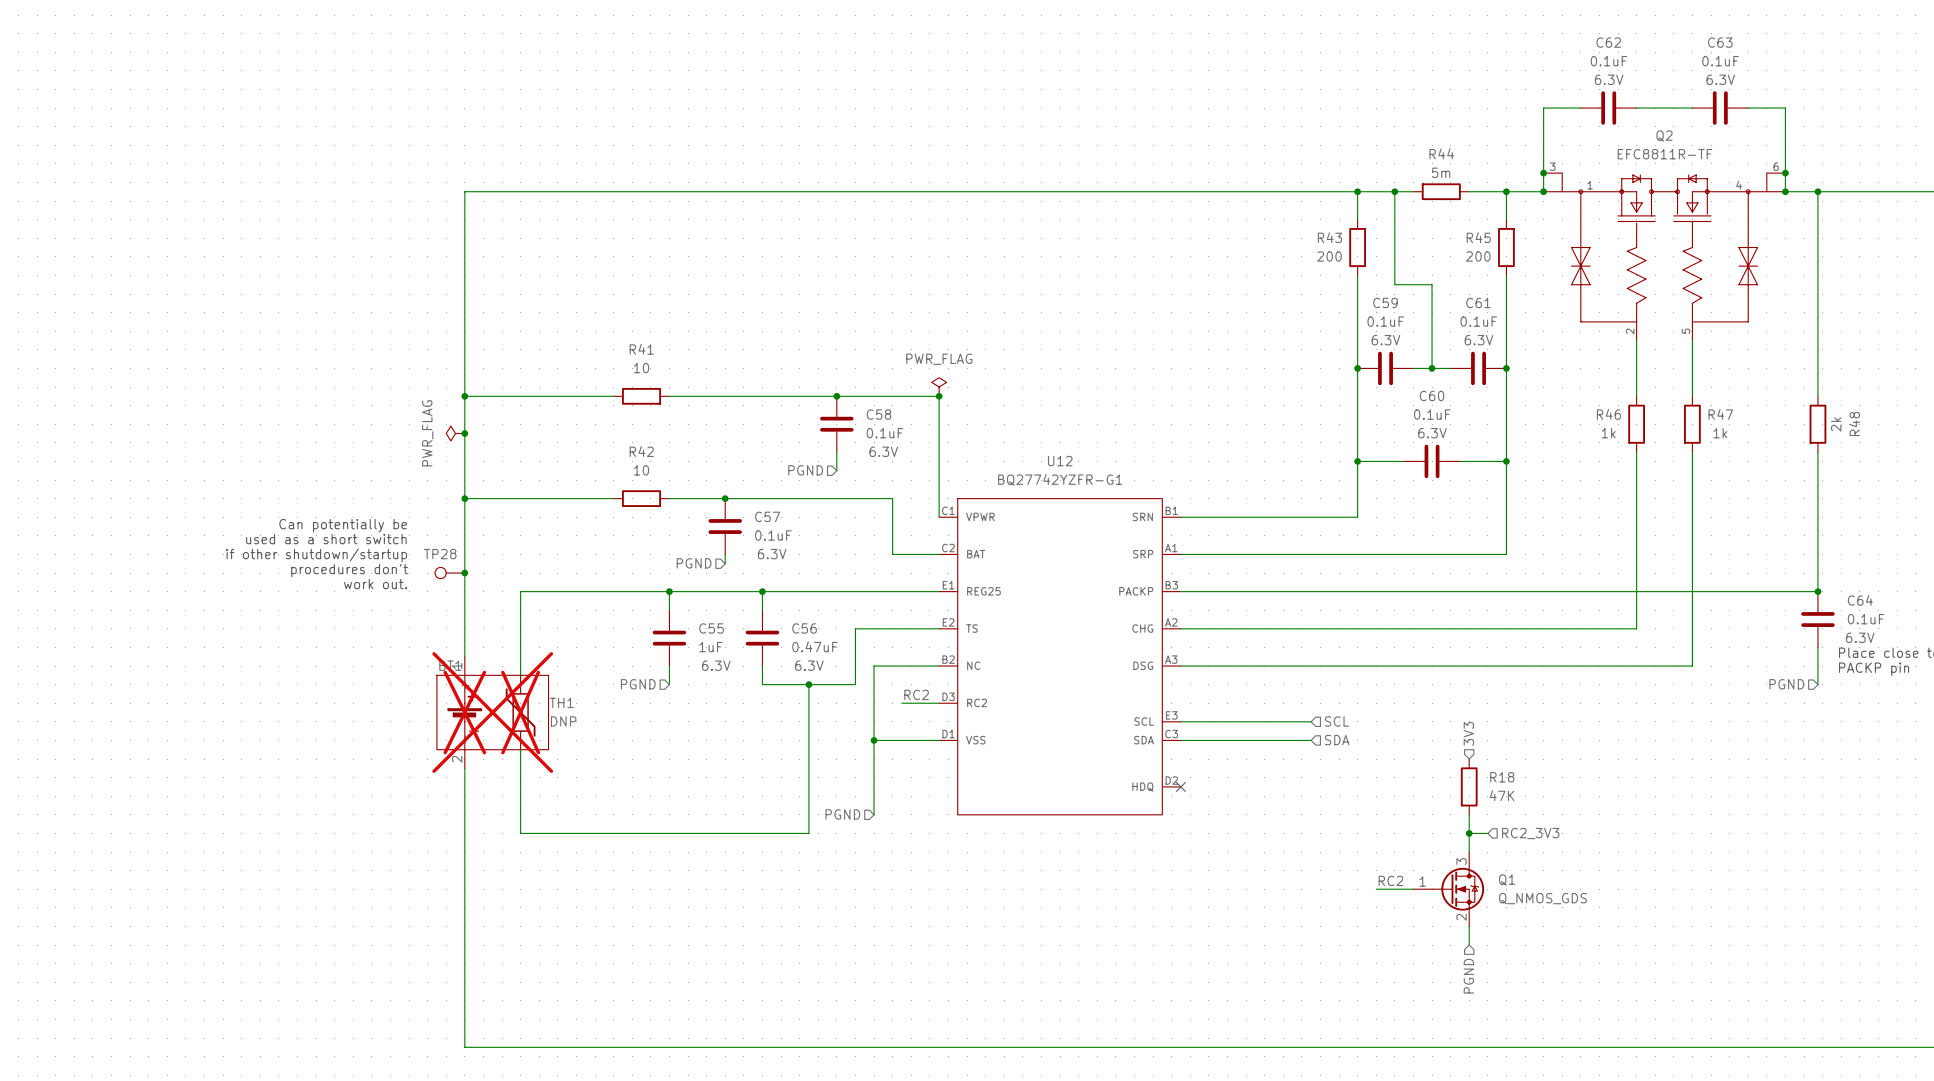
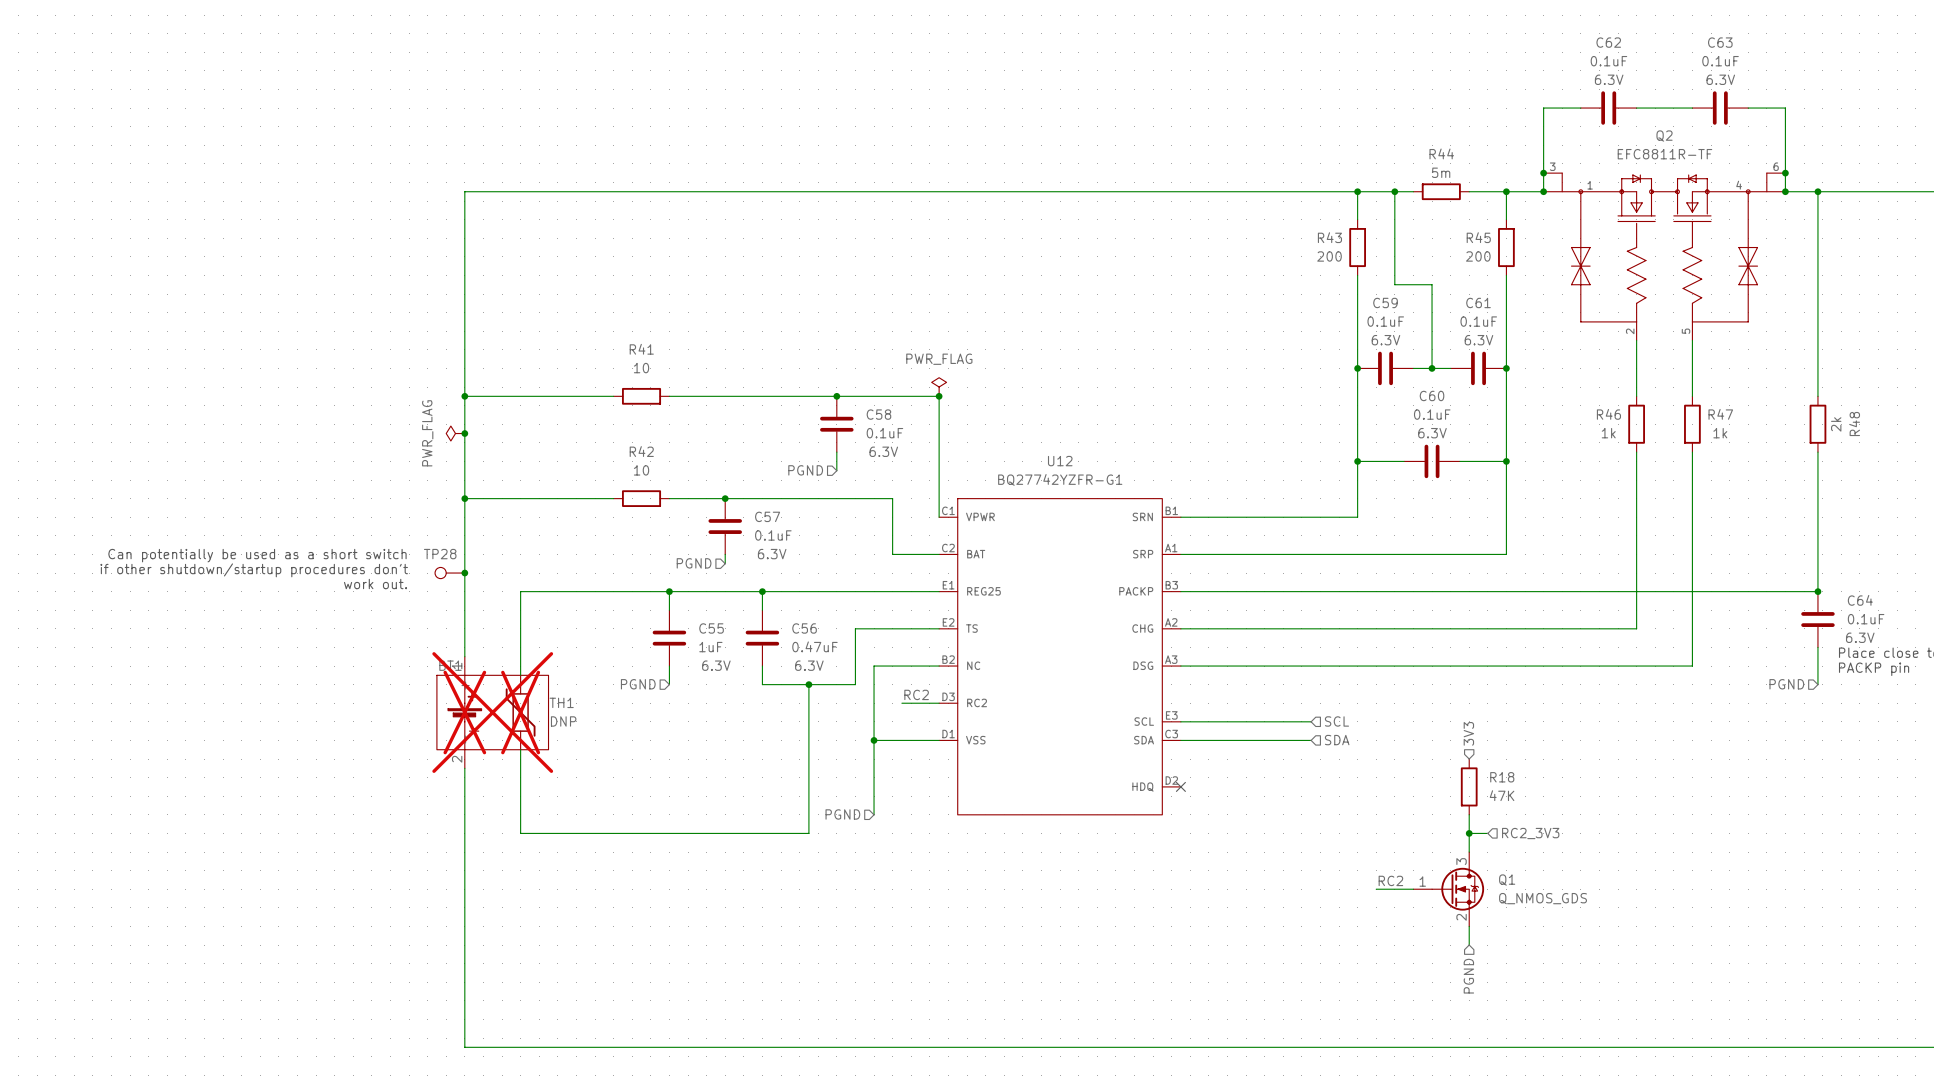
text: Can potentially be (343, 525) -> none
text: used as a short switch (326, 539) -> none
text: if other shutdown/startup (316, 555) -> Can potentially be used as a short switch (257, 555)
text: procedures don't (349, 570) -> if other shutdown/startup procedures don't (254, 570)

